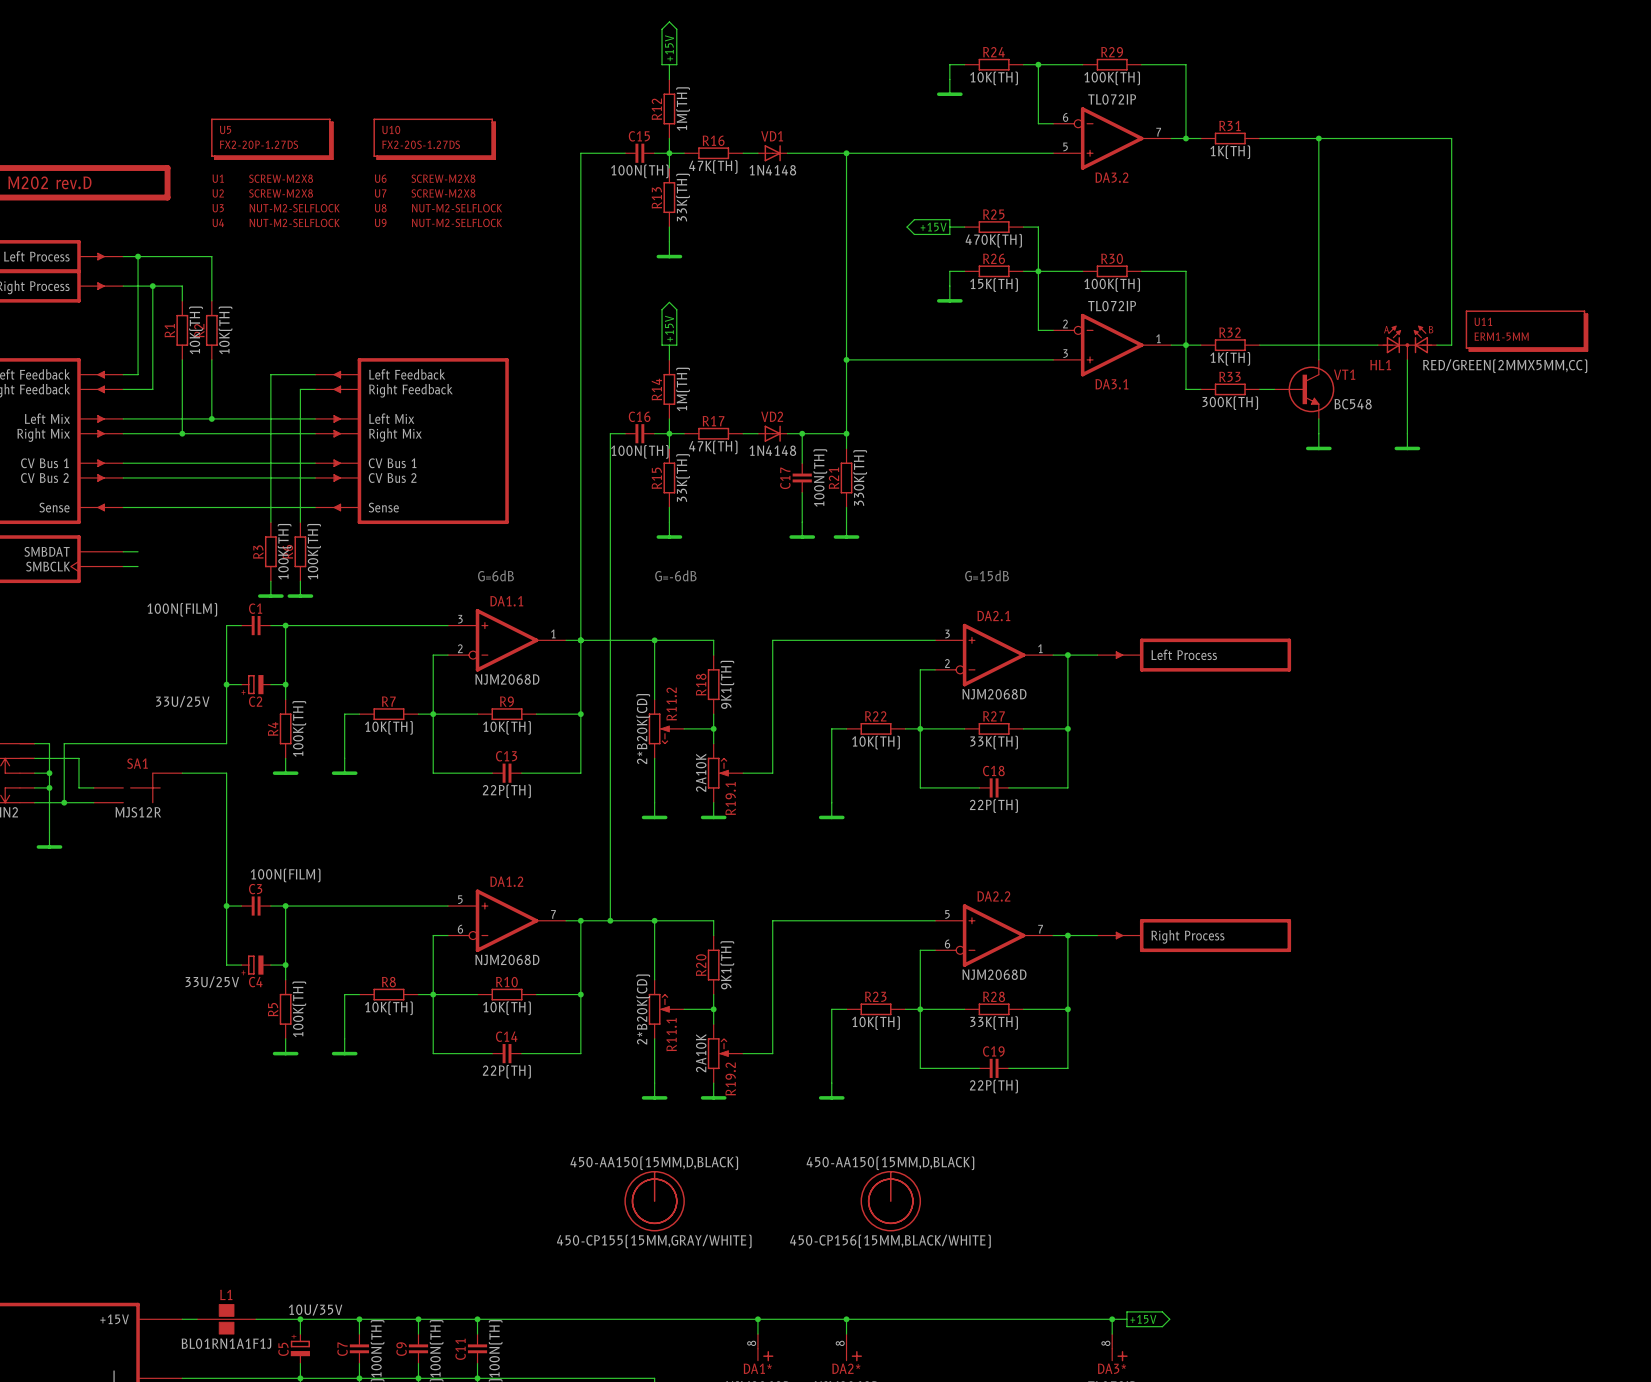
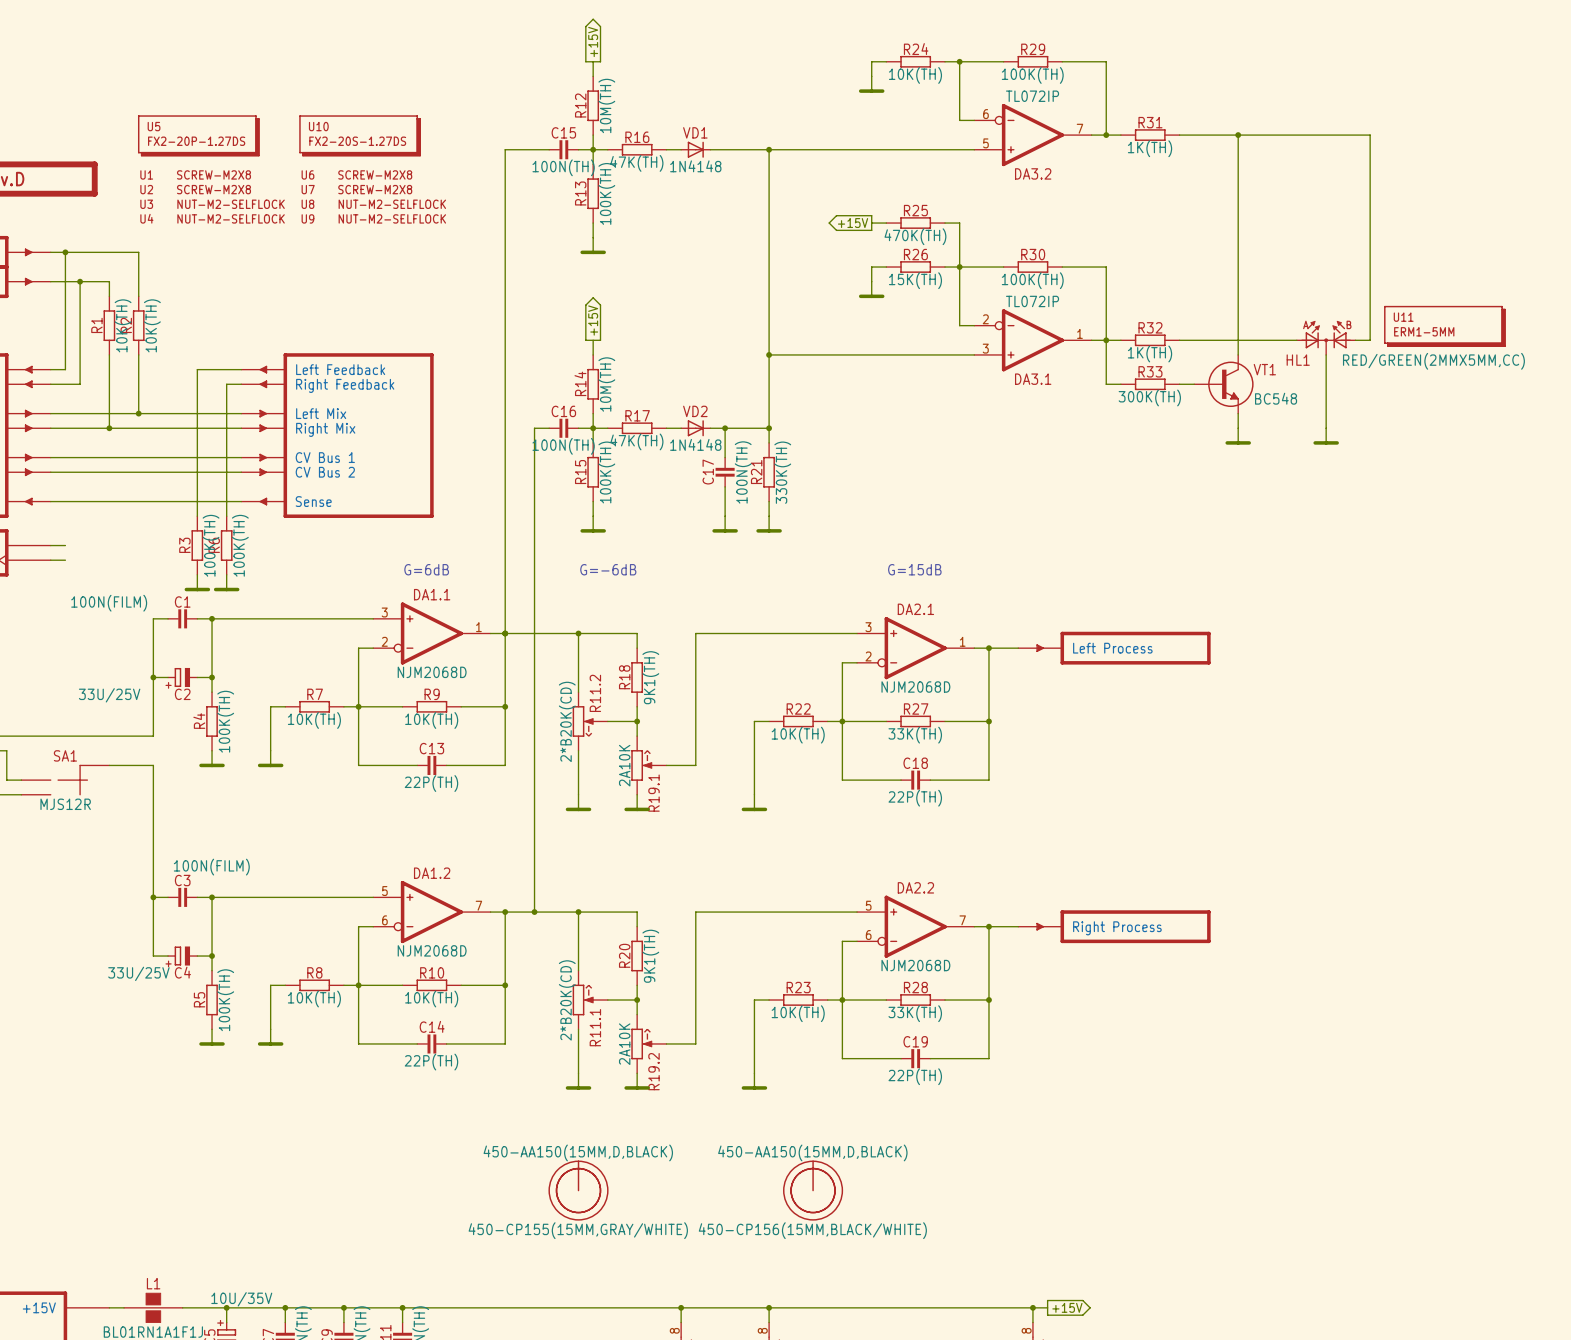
R12 value: 1M(TH) (683, 108) -> 10M(TH) (606, 105)
R13 value: 33K(TH) (683, 197) -> 100K(TH) (606, 193)
R14 value: 1M(TH) (683, 389) -> 10M(TH) (606, 384)
R15 value: 33K(TH) (683, 477) -> 100K(TH) (606, 472)

